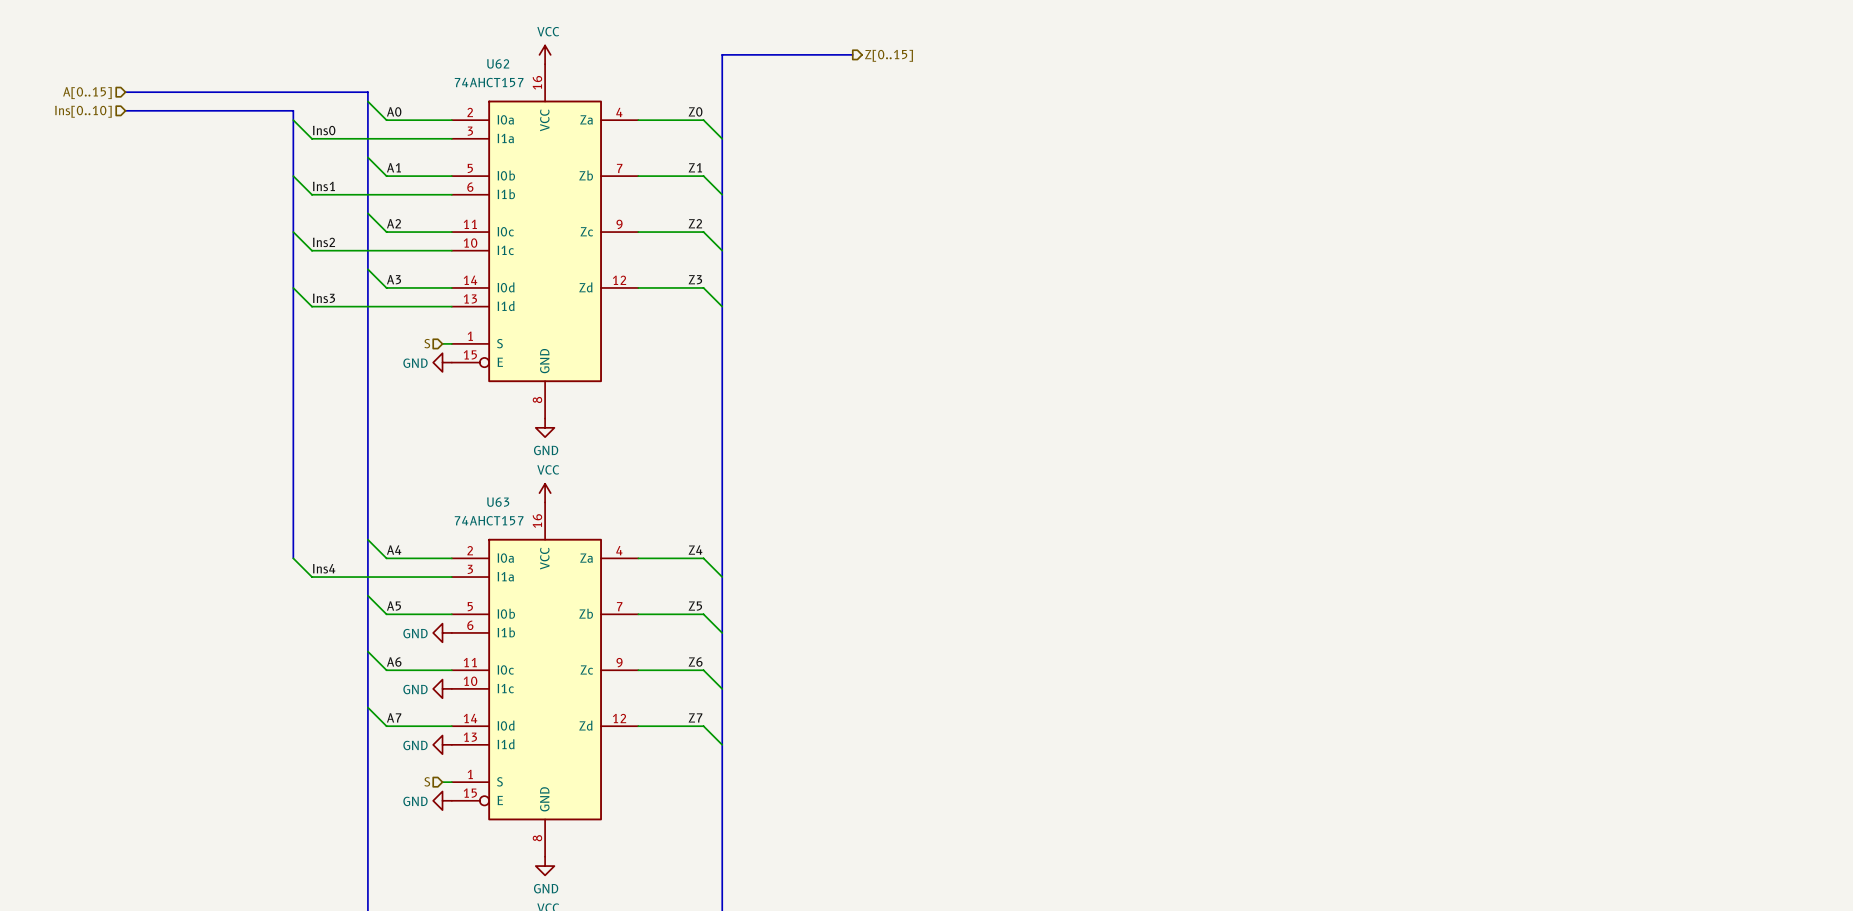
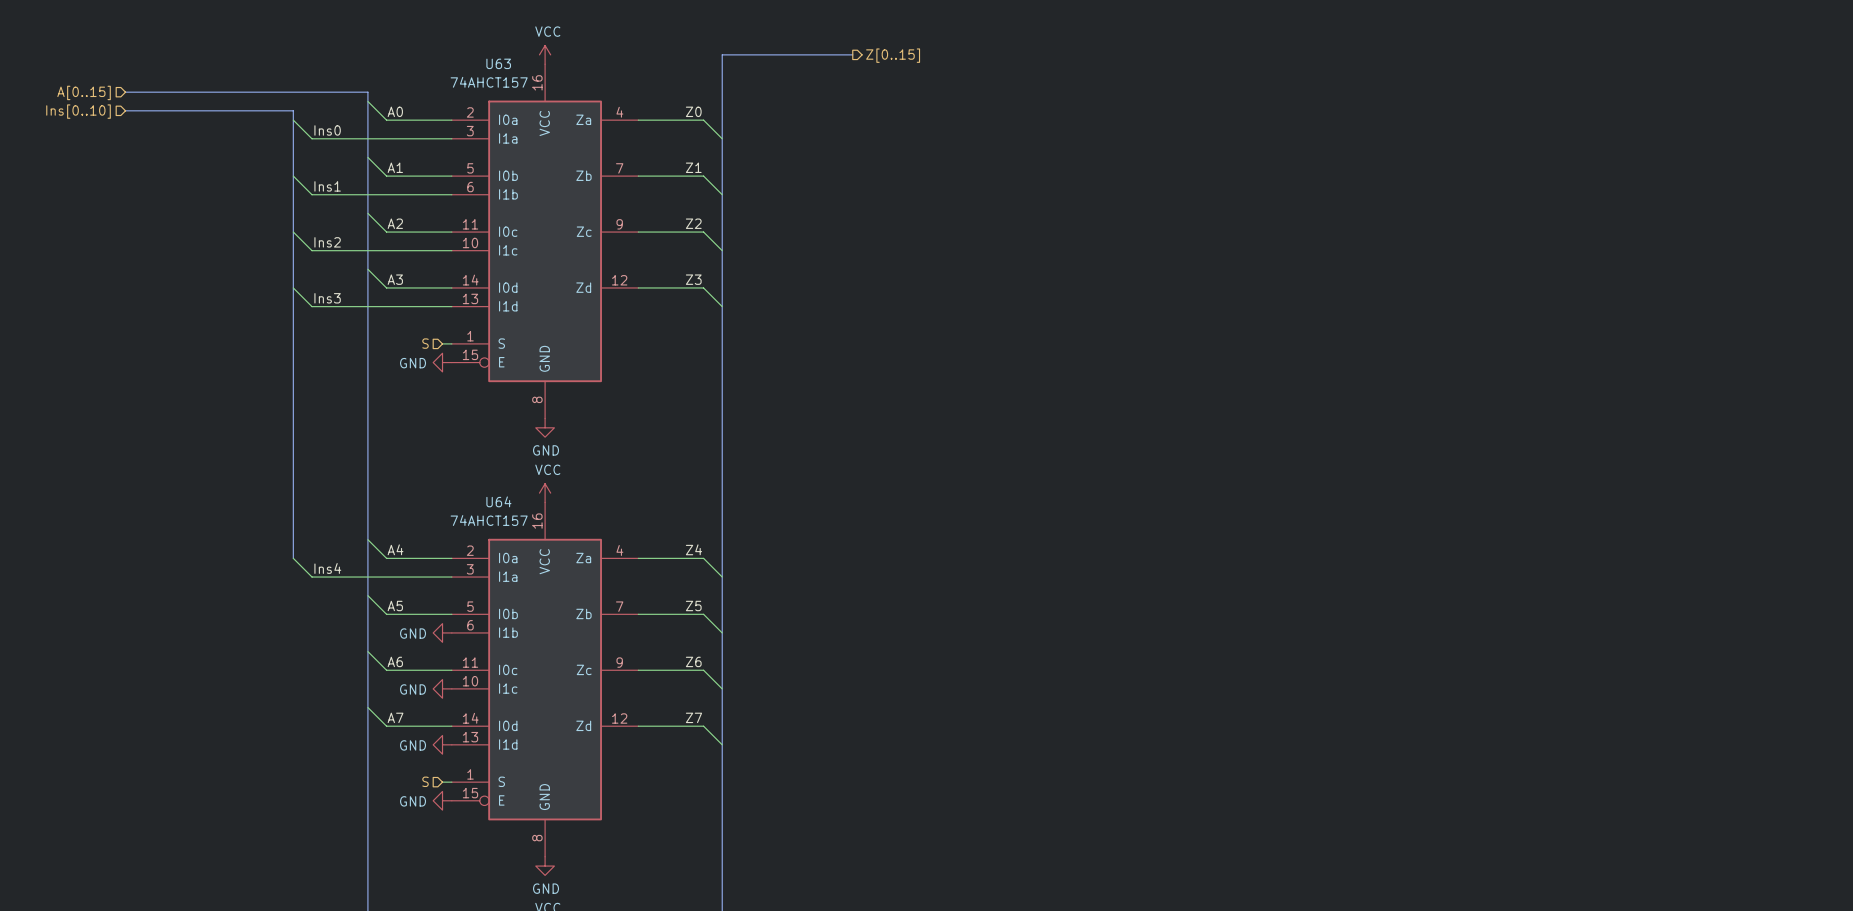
U62 name: U62 (498, 63) -> U63 (498, 63)
U63 name: U63 (498, 502) -> U64 (498, 501)

